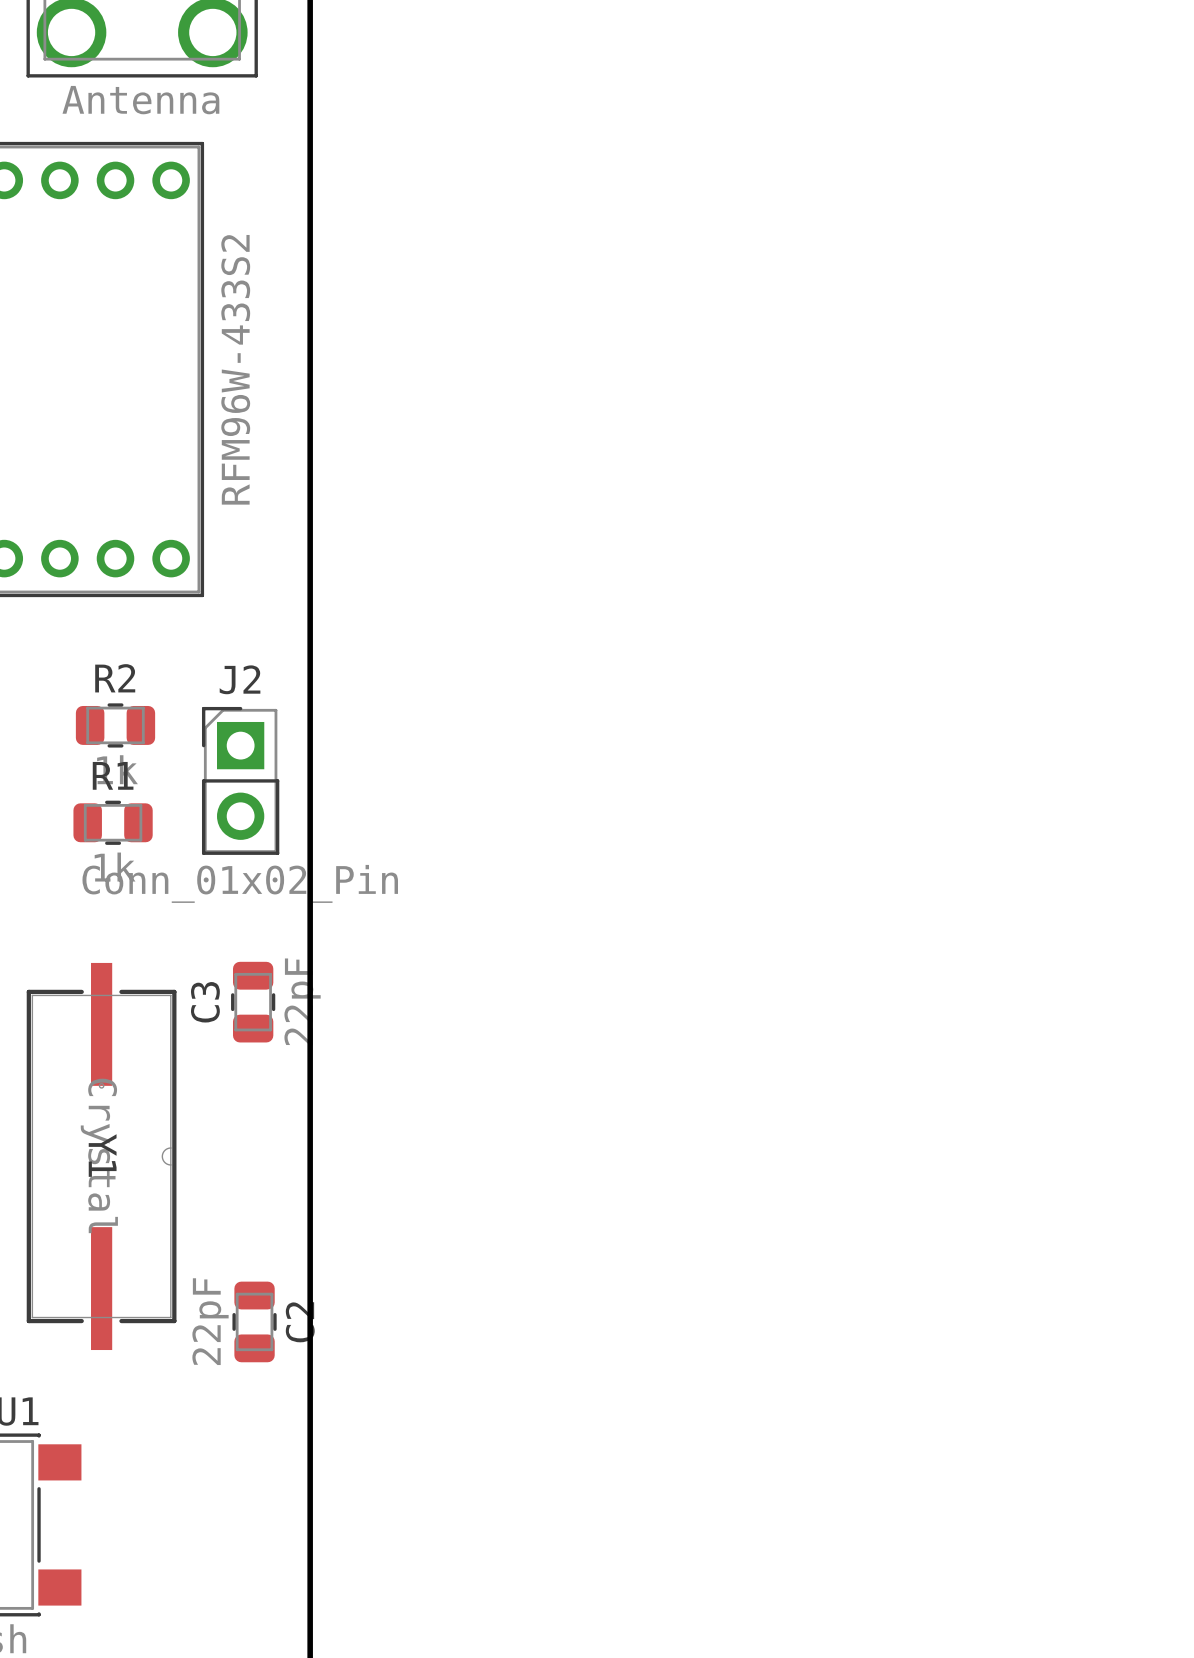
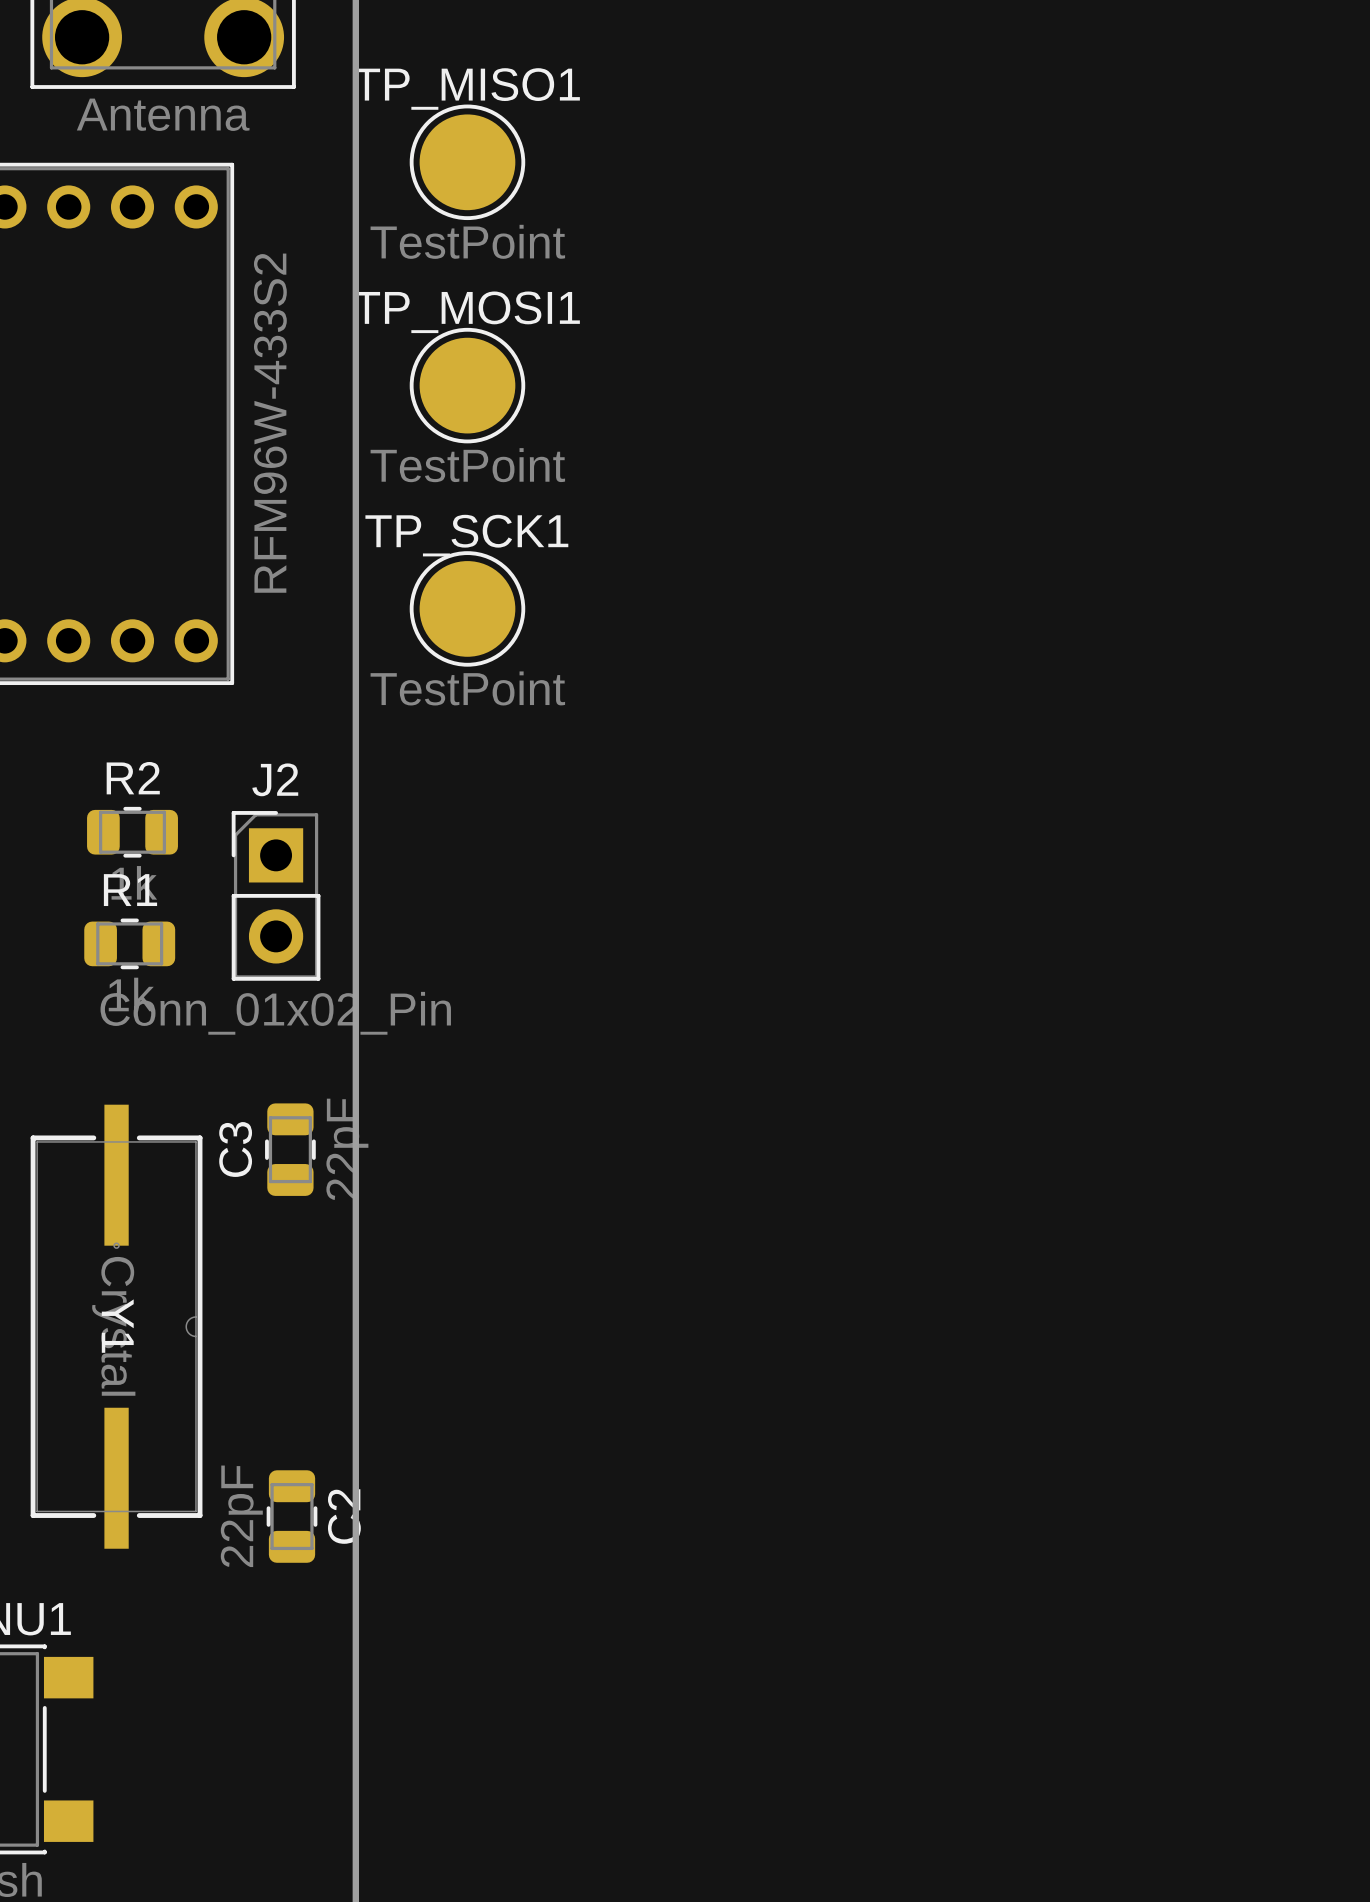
TP_MISO1: none -> TestPoint (467, 162)
TP_MOSI1: none -> TestPoint (467, 385)
TP_SCK1: none -> TestPoint (467, 608)

